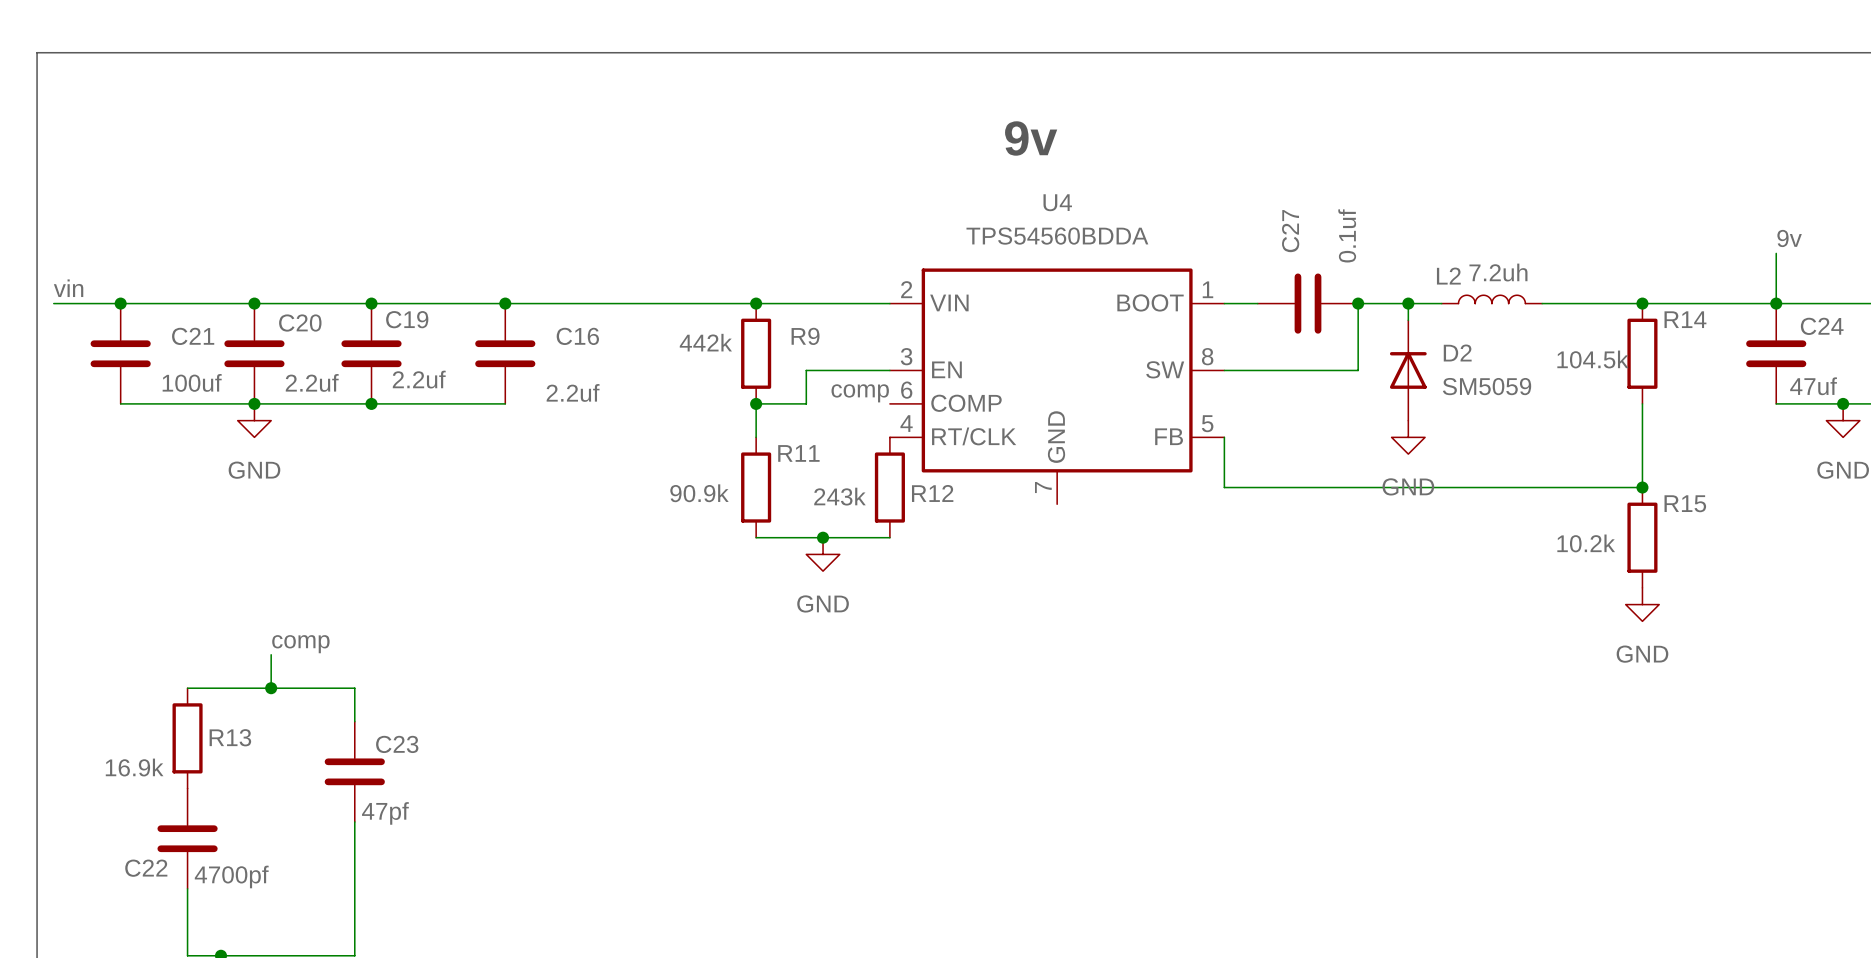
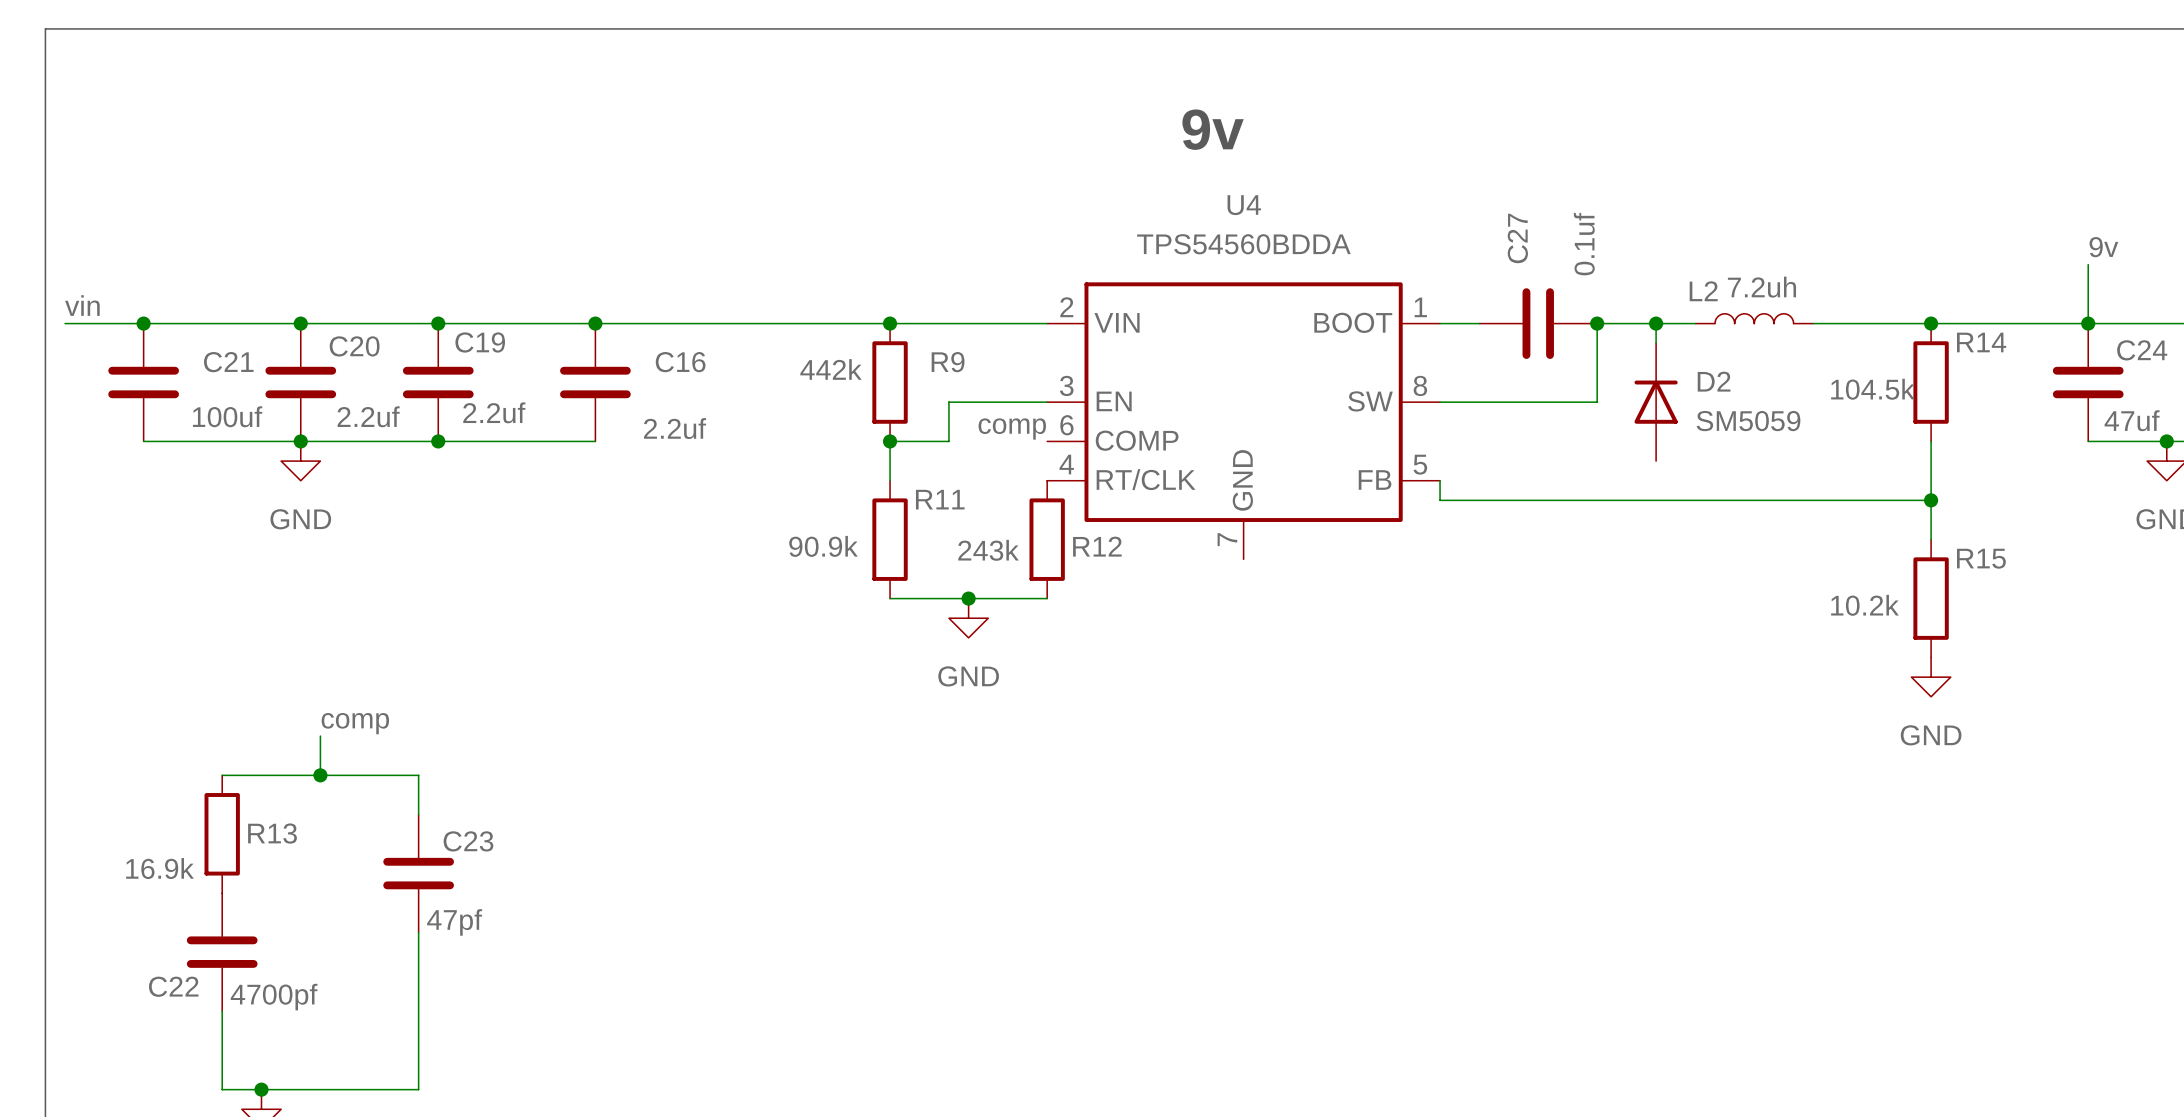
power symbol: GND (1408, 437) -> none
wire: (1224, 454) (1224, 487) (1642, 487) -> (1440, 500) (1931, 500)
junction position: (1642, 487) -> (1931, 500)

